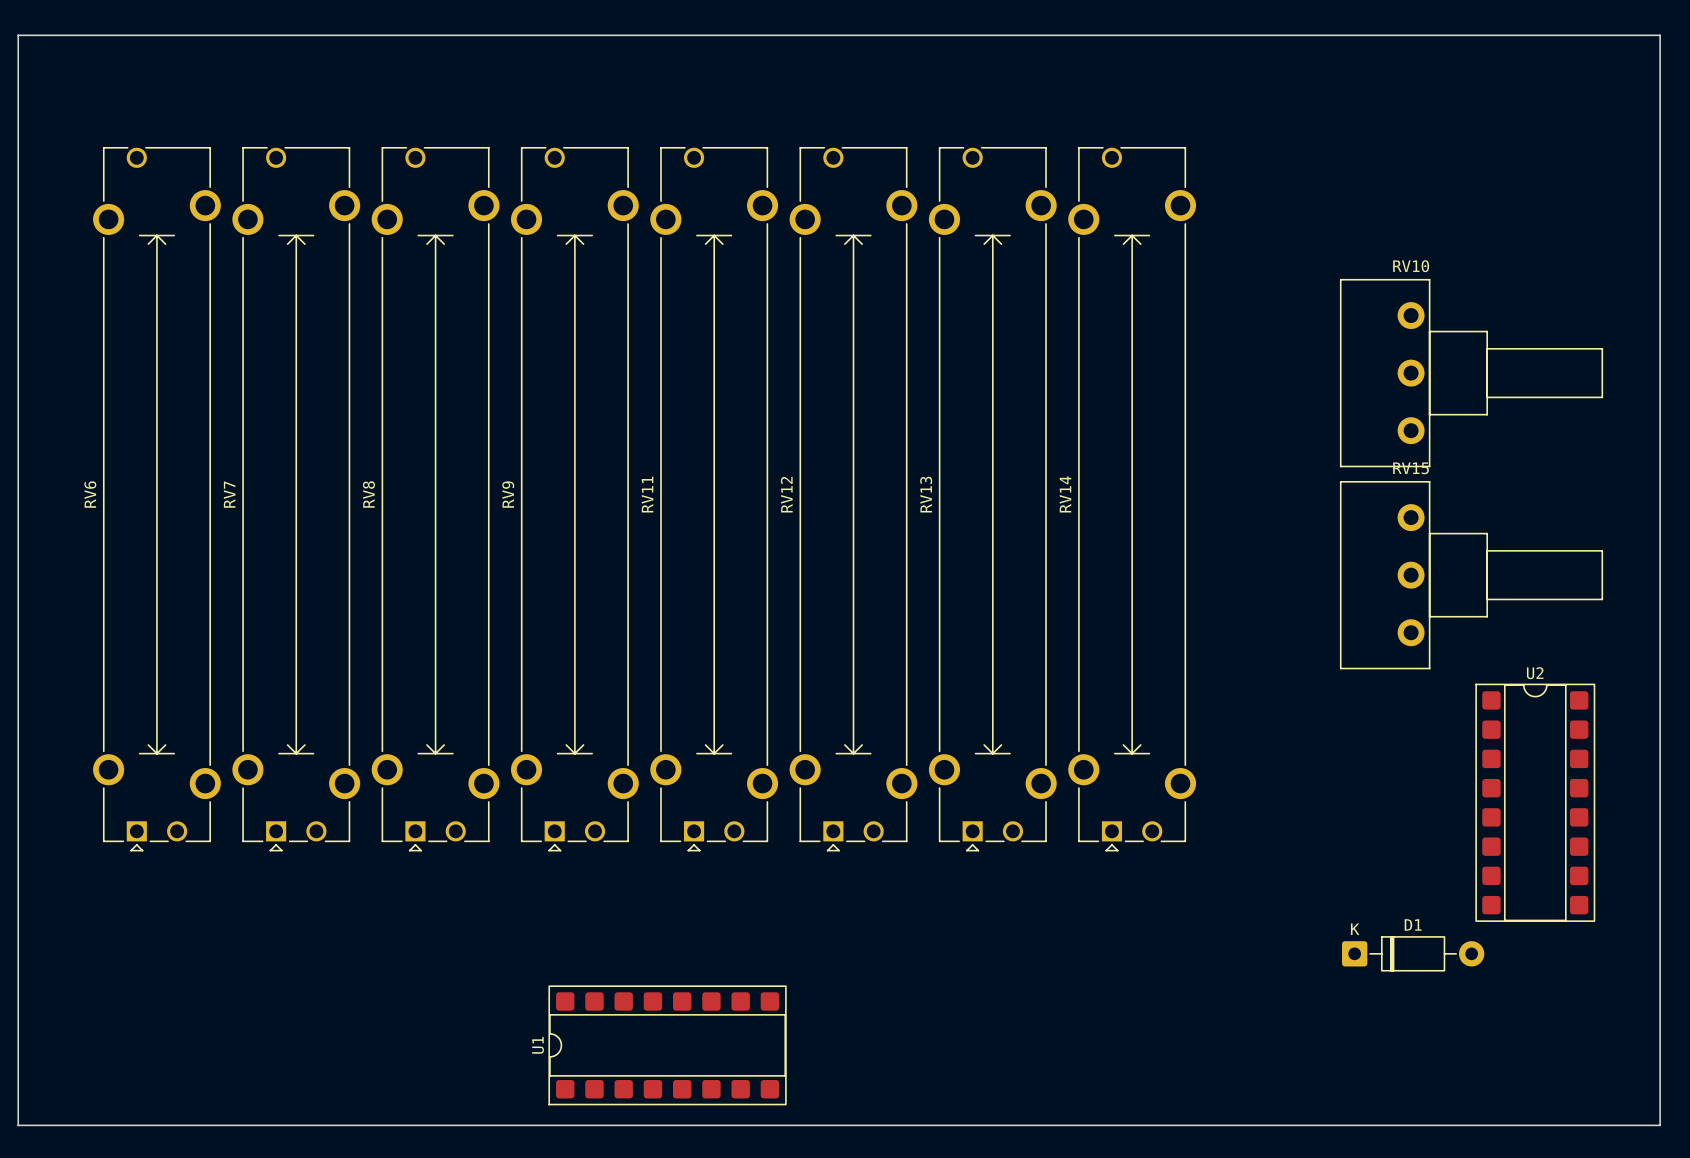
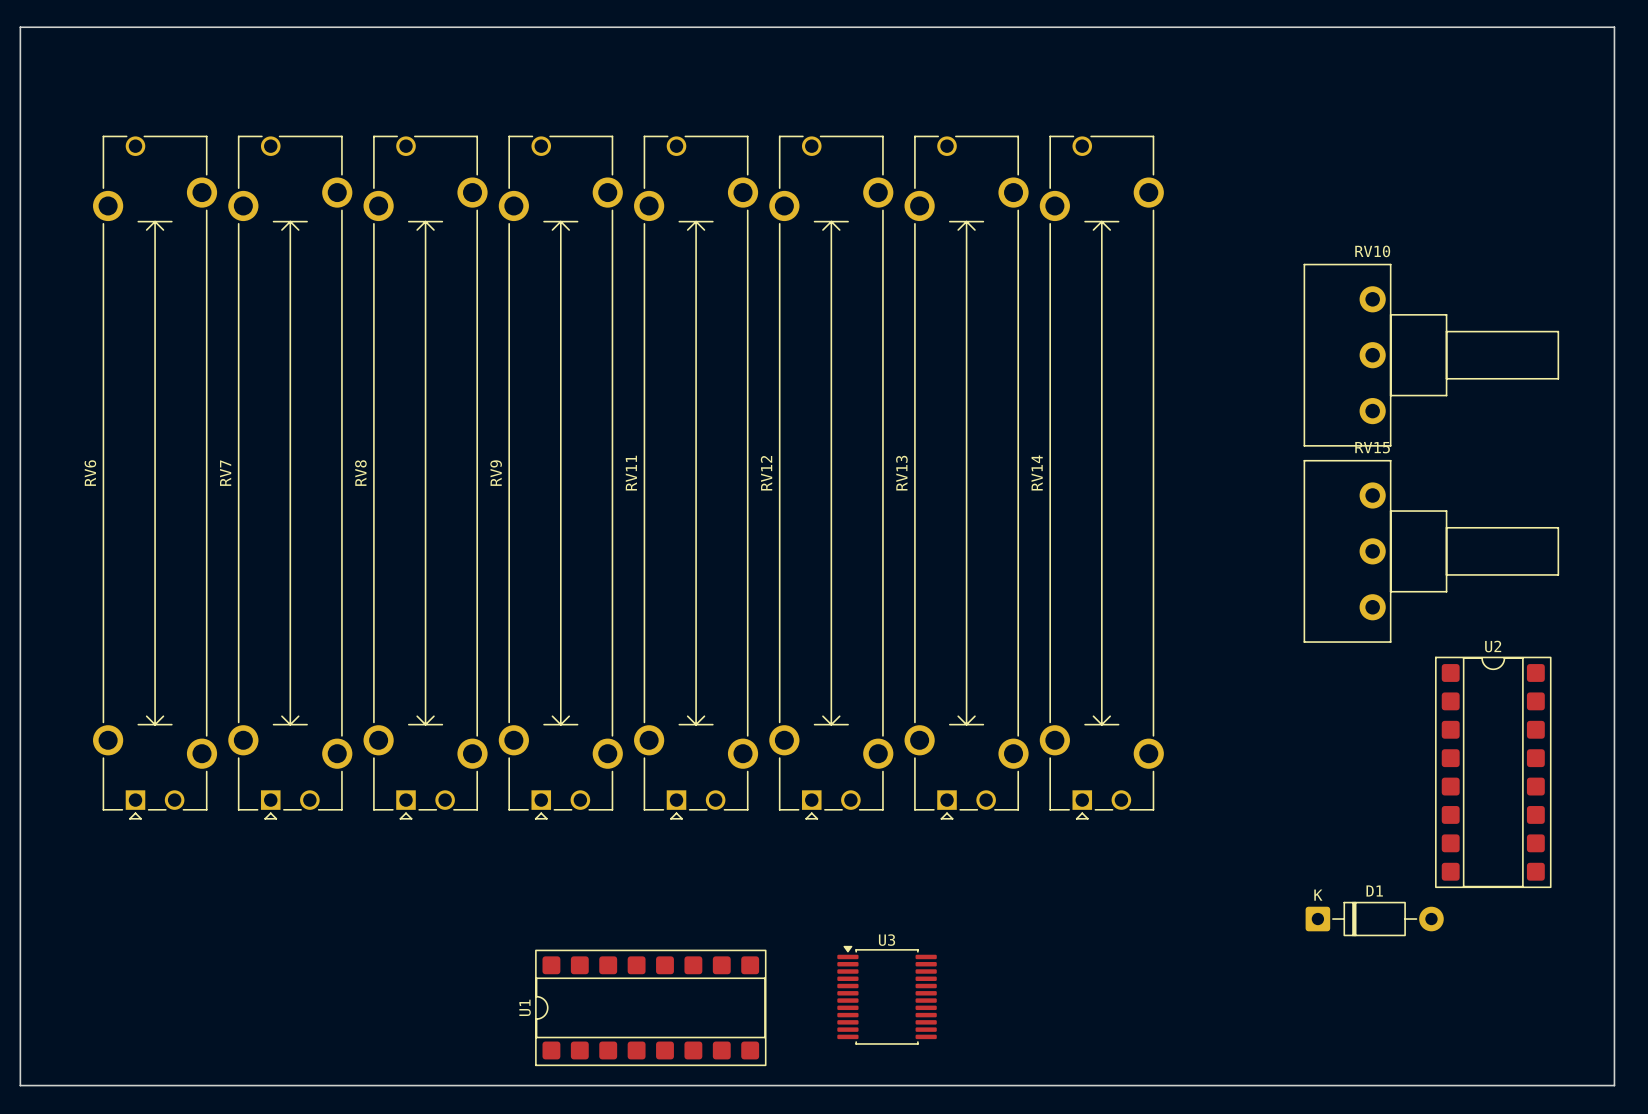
U3: none -> (887, 995)

